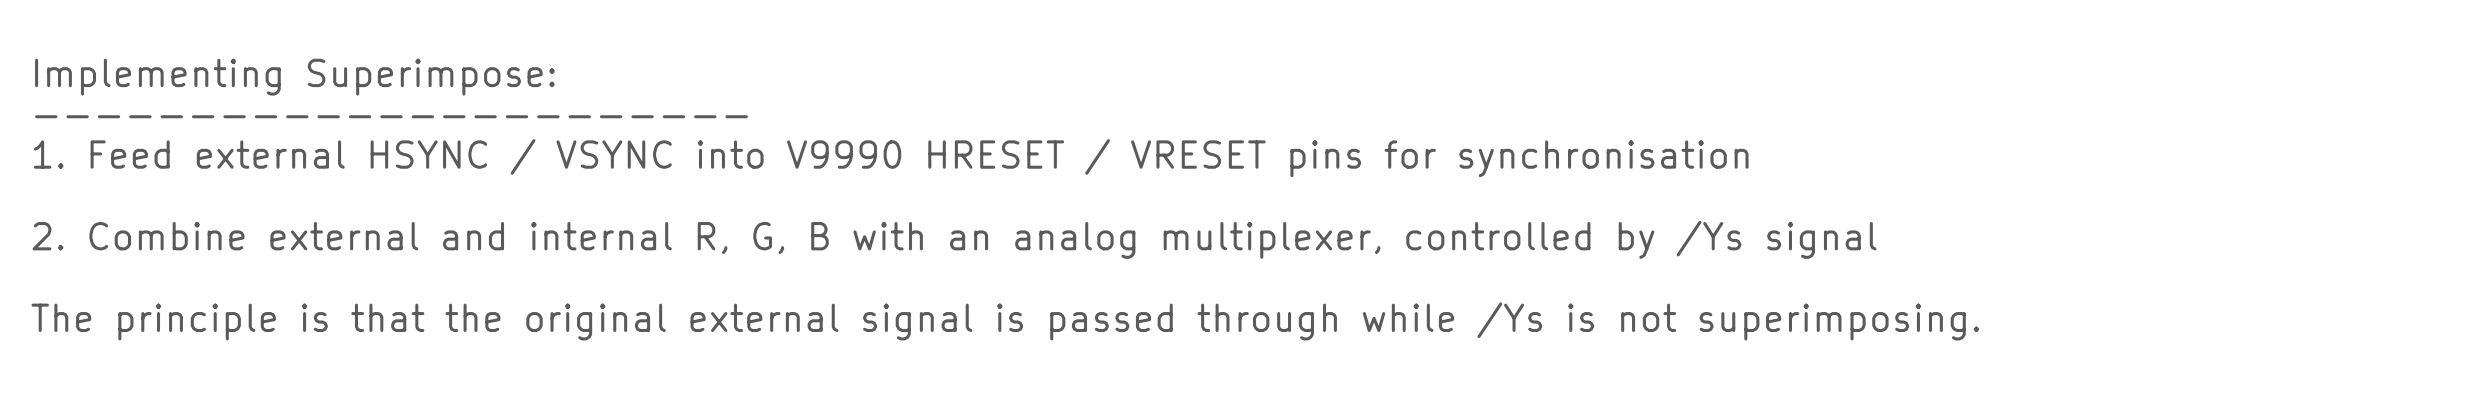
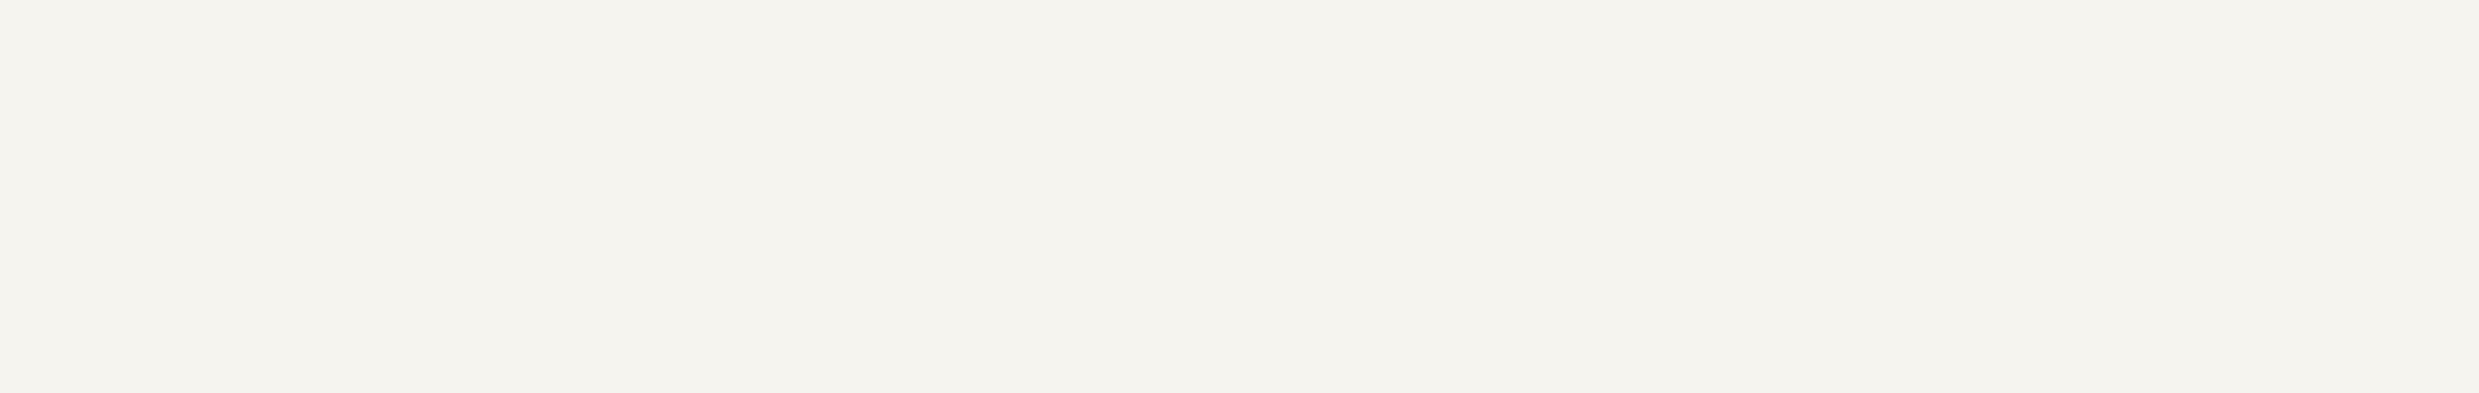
text: Implementing Superimpose: (294, 77) -> none
text: ----------------------- (391, 116) -> none
text: 1. Feed external HSYNC / VSYNC into V9990 HRESET / VRESET pins for synchronisation (891, 158) -> none
text: 2. Combine external and internal R, G, B with an analog multiplexer, controlled by /Ys signal (954, 239) -> none
text: The principle is that the original external signal is passed through while /Ys is not superimposing. (1005, 321) -> none

